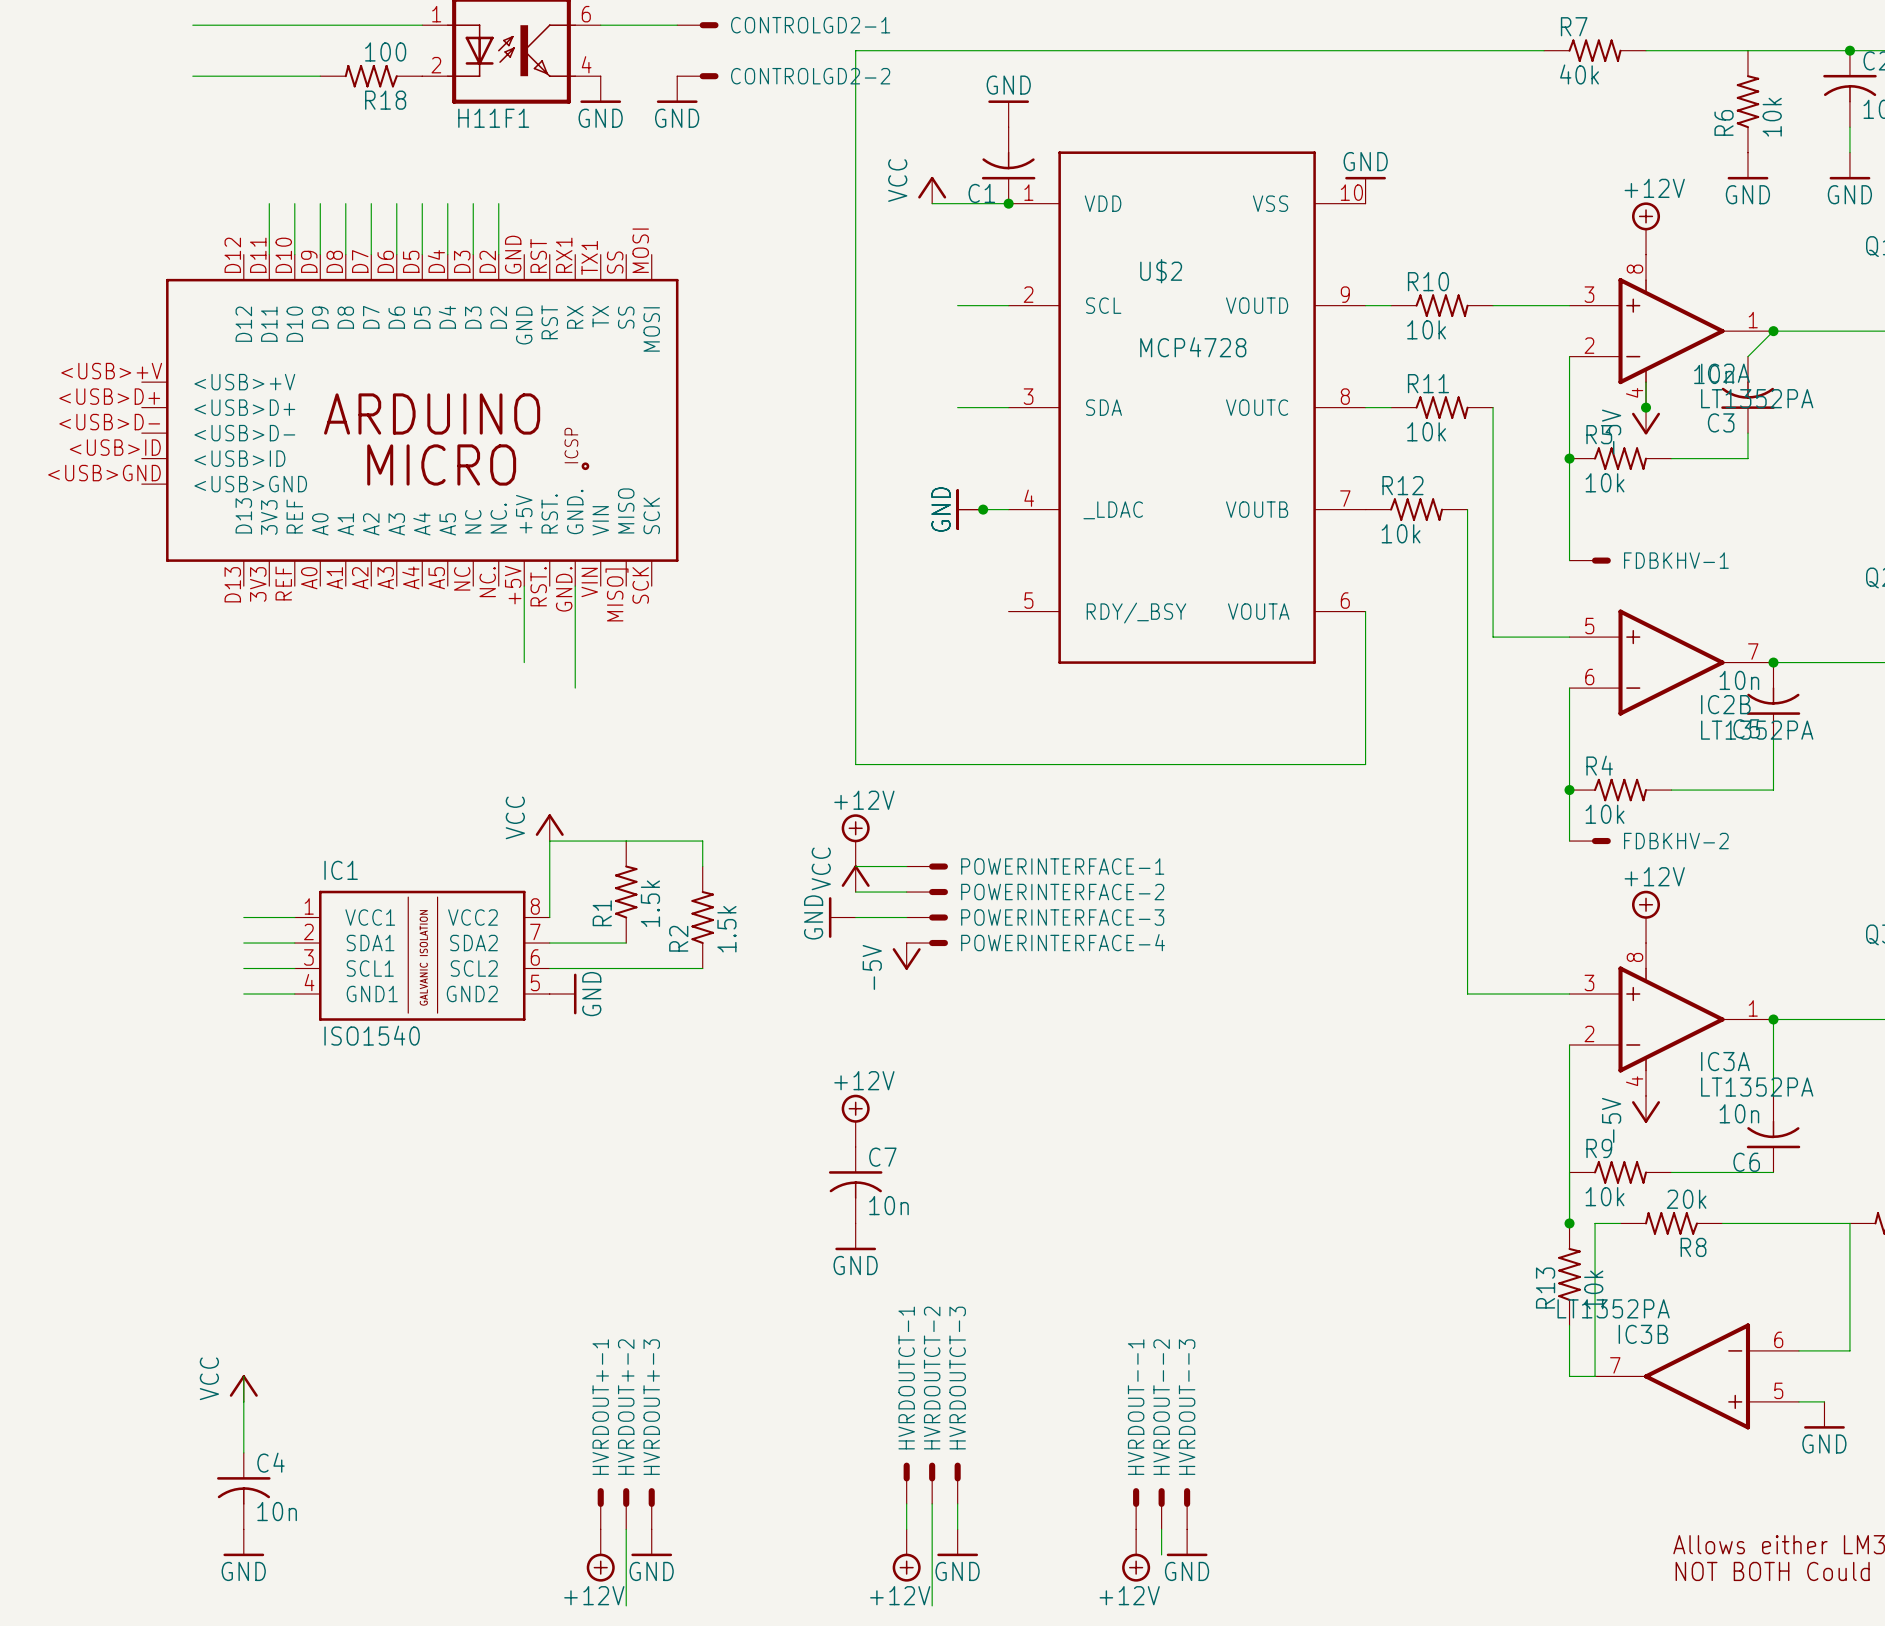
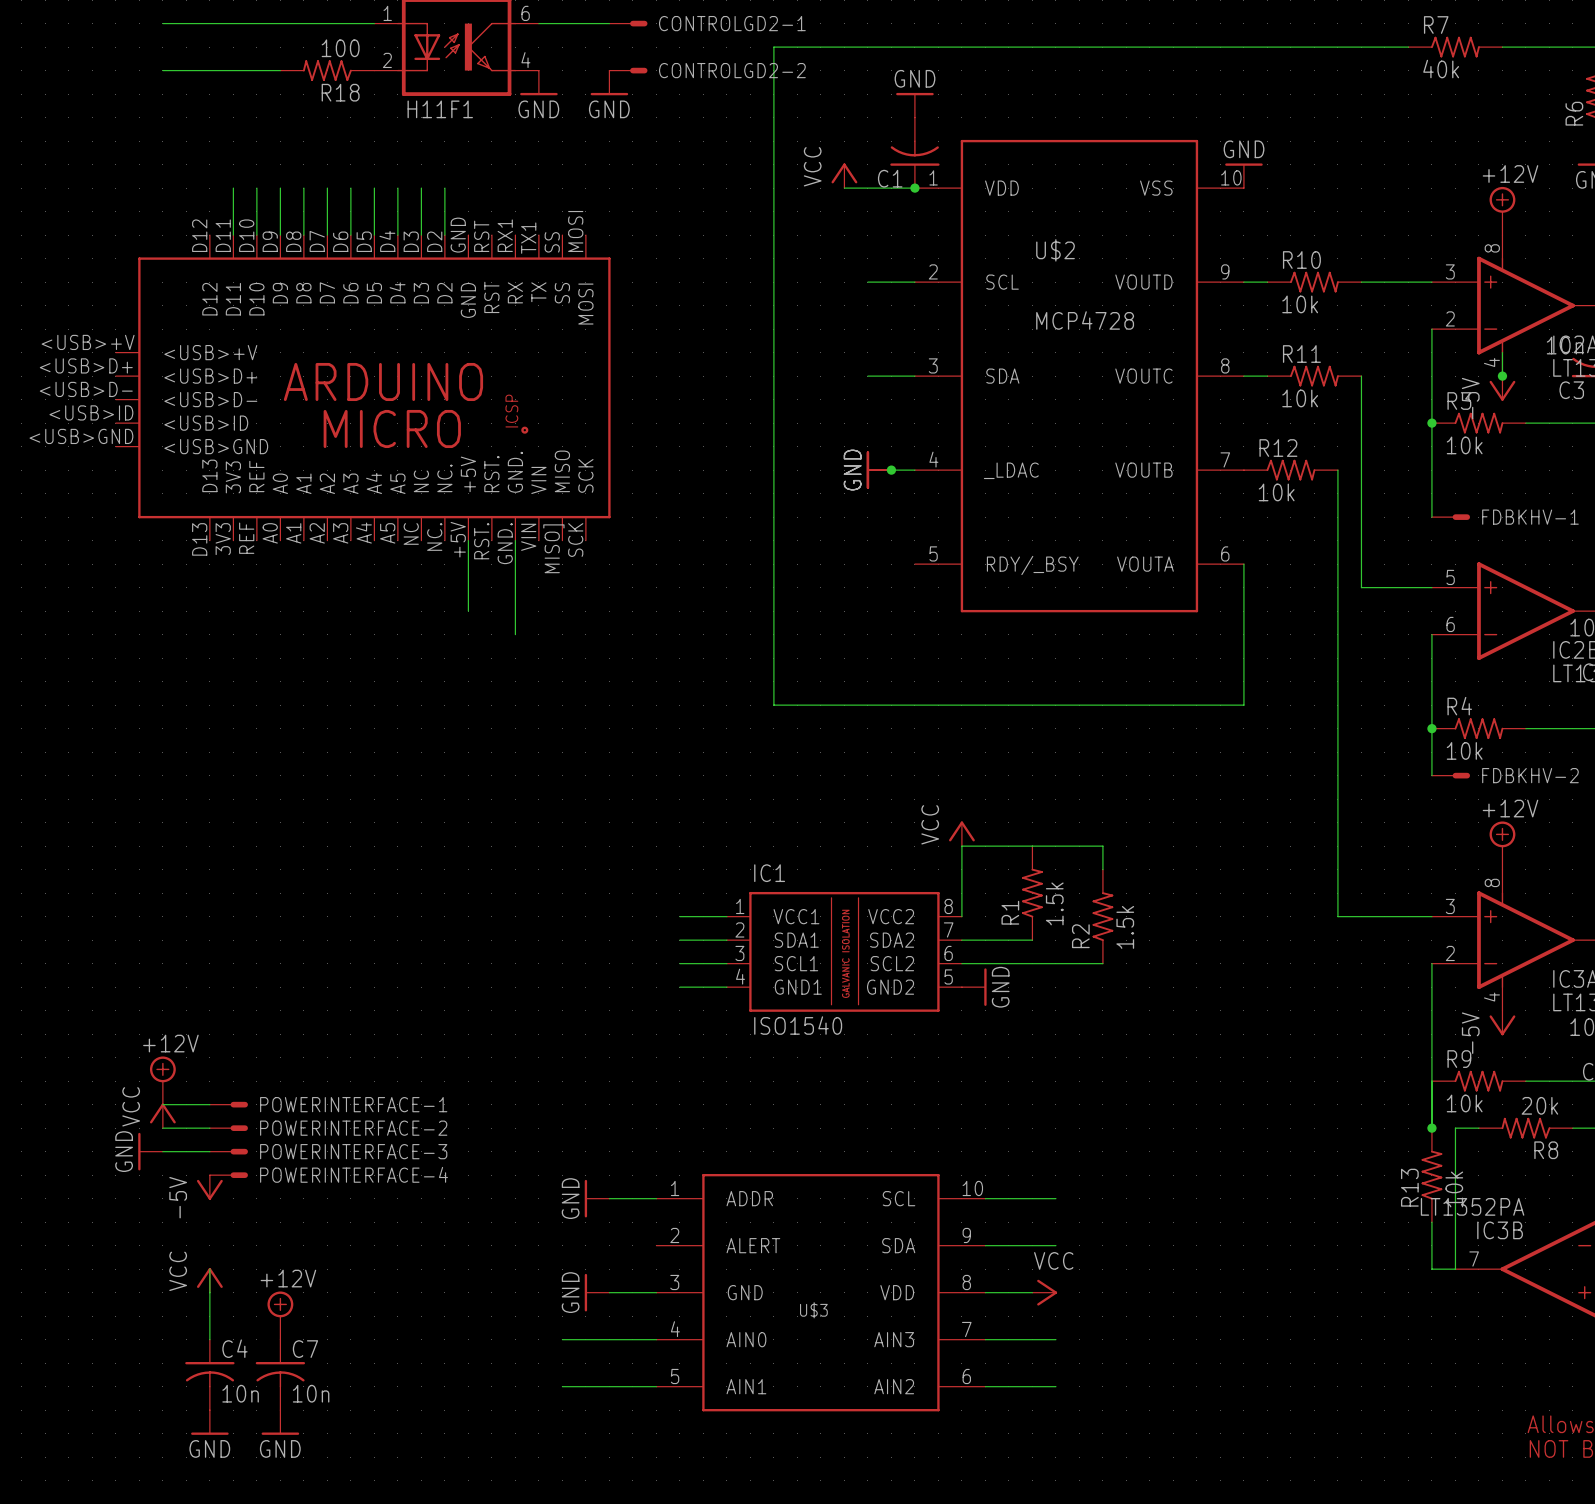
power symbol: VCC (549, 827) -> none
power symbol: +12V (855, 840) -> none
wire: (702, 866) (702, 841) (549, 841) (549, 917) -> none
wire: (855, 866) (906, 866) -> (679, 916) (726, 916)
POWERINTERFACE-1 position: (927, 866) -> (228, 1104)
power symbol position: VCC (855, 878) -> VCC (961, 833)
R1 position: (626, 892) -> (1032, 893)
wire: (855, 892) (906, 892) -> (679, 940) (726, 940)
POWERINTERFACE-2 position: (927, 892) -> (228, 1128)
wire: (243, 917) (294, 917) -> none
R2 position: (702, 917) -> (1102, 916)
power symbol: GND (842, 917) -> none
wire: (855, 917) (906, 917) -> (679, 963) (726, 963)
POWERINTERFACE-3 position: (927, 917) -> (228, 1151)
wire: (243, 943) (294, 943) -> none
wire: (549, 943) (626, 943) -> none
POWERINTERFACE-4 position: (927, 943) -> (228, 1175)
wire: none -> (1102, 869) (1102, 846) (961, 846) (961, 916)
IC1 position: (422, 955) -> (844, 951)
power symbol: -5V (906, 956) -> none
wire: (243, 968) (294, 968) -> (162, 1104) (209, 1104)
wire: (549, 968) (702, 968) -> none
wire: (243, 994) (294, 994) -> (162, 1128) (209, 1128)
power symbol: GND (563, 994) -> none
wire: none -> (961, 940) (1032, 940)
wire: none -> (961, 963) (1102, 963)
wire: none -> (679, 987) (726, 987)
power symbol: none -> GND (974, 987)
power symbol: +12V (855, 1120) -> none
power symbol: none -> +12V (162, 1080)
C7 position: (855, 1185) -> (280, 1374)
power symbol: none -> VCC (162, 1115)
power symbol: GND (855, 1236) -> none
power symbol: none -> GND (150, 1151)
wire: none -> (162, 1151) (209, 1151)
power symbol: none -> -5V (209, 1187)
power symbol: none -> GND (597, 1198)
wire: none -> (609, 1198) (656, 1198)
wire: none -> (985, 1198) (1055, 1198)
wire: none -> (985, 1245) (1055, 1245)
power symbol: none -> GND (597, 1292)
wire: none -> (609, 1292) (656, 1292)
U$3: none -> (820, 1292)
wire: none -> (985, 1292) (1032, 1292)
power symbol: none -> VCC (1044, 1292)
power symbol: none -> +12V (280, 1315)
wire: none -> (562, 1339) (656, 1339)
wire: none -> (985, 1339) (1055, 1339)
HVRDOUTCT-1: (906, 1483) -> none
HVRDOUTCT-2: (932, 1483) -> none
HVRDOUTCT-3: (957, 1483) -> none
wire: none -> (562, 1386) (656, 1386)
wire: (906, 1503) (906, 1529) -> none
wire: (932, 1503) (932, 1605) -> none
wire: (957, 1503) (957, 1529) -> none
wire: none -> (985, 1386) (1055, 1386)
HVRDOUT+-1: (600, 1508) -> none
HVRDOUT+-2: (626, 1508) -> none
HVRDOUT+-3: (651, 1508) -> none
HVRDOUT--1: (1136, 1508) -> none
HVRDOUT--2: (1161, 1508) -> none
HVRDOUT--3: (1187, 1508) -> none
wire: (626, 1529) (626, 1605) -> none
wire: (1161, 1529) (1161, 1554) -> none
power symbol: none -> GND (280, 1422)
power symbol: GND (651, 1542) -> none
power symbol: GND (957, 1542) -> none
power symbol: GND (1187, 1542) -> none
power symbol: +12V (600, 1555) -> none
power symbol: +12V (906, 1555) -> none
power symbol: +12V (1136, 1555) -> none

